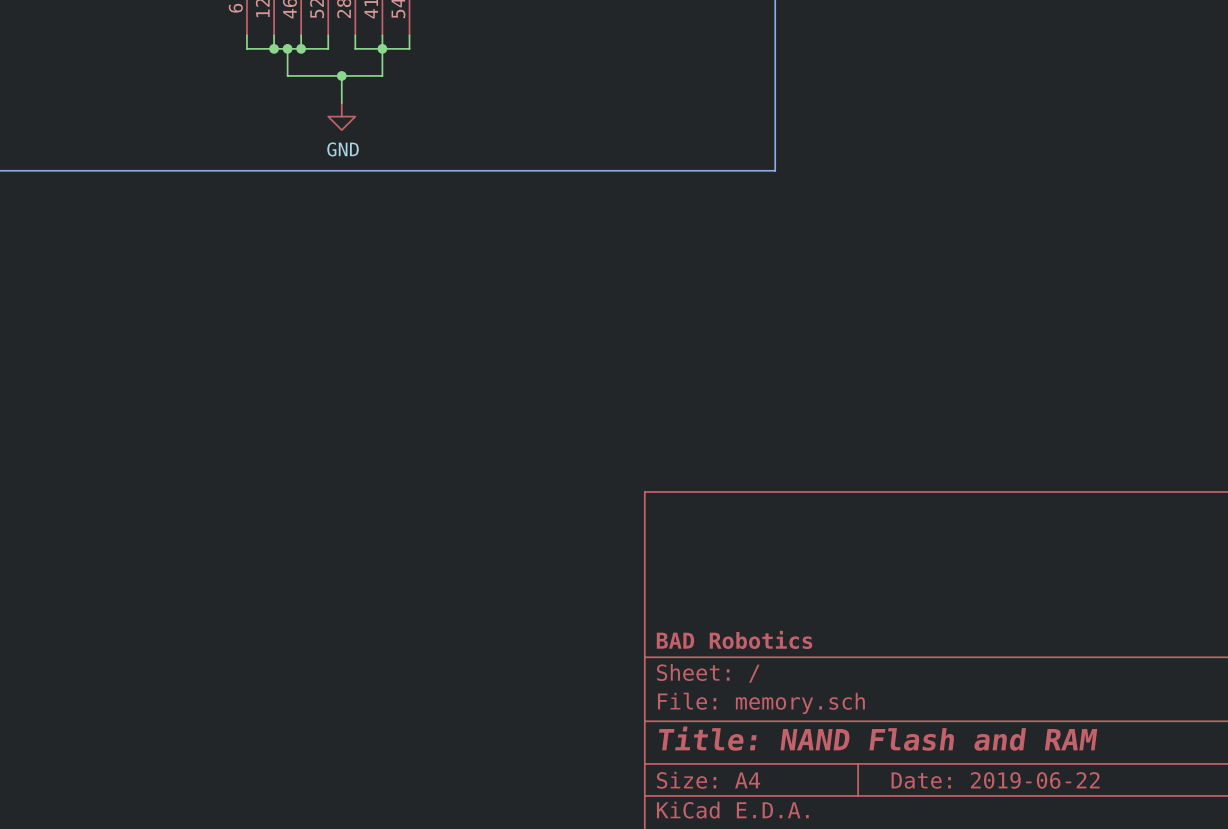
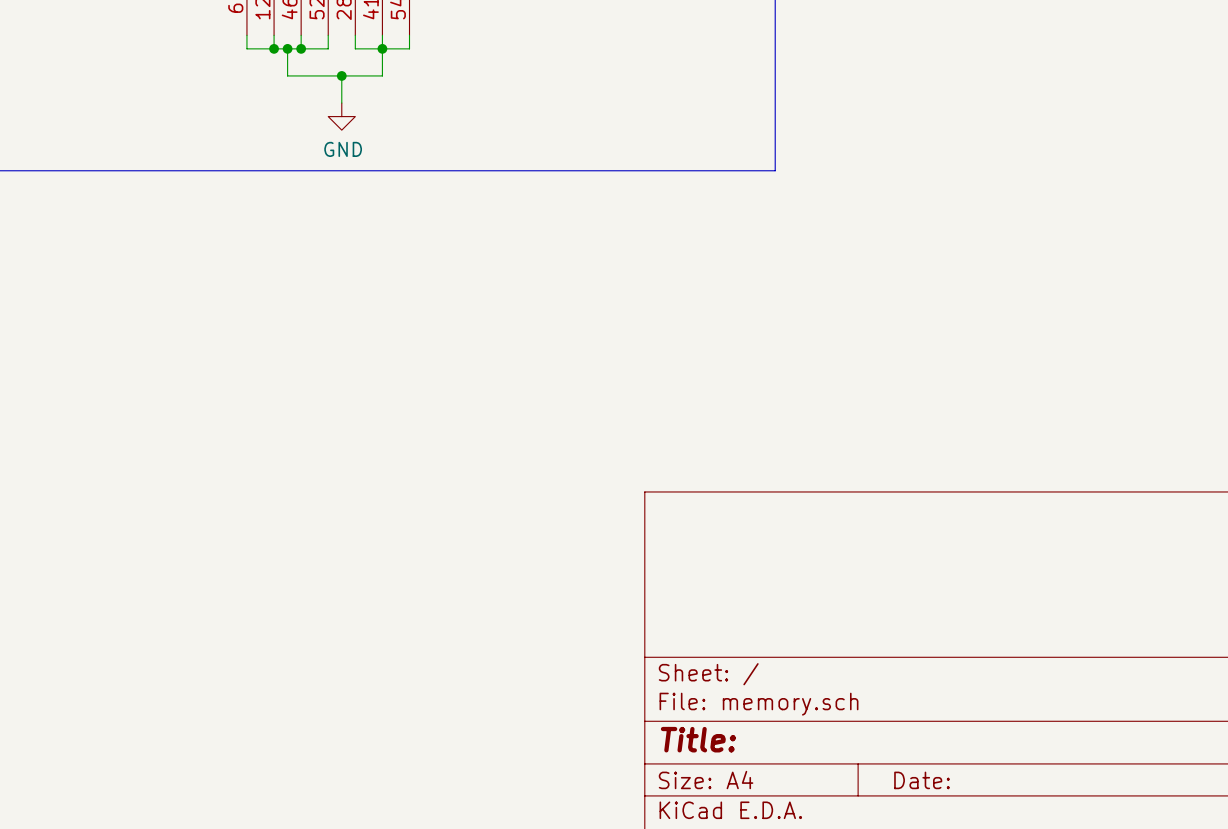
title block: BAD Robotics (734, 639) -> none
title block: Title: NAND Flash and RAM (878, 738) -> Title: (698, 739)
title block: Date: 2019-06-22 (995, 780) -> Date: (922, 780)

